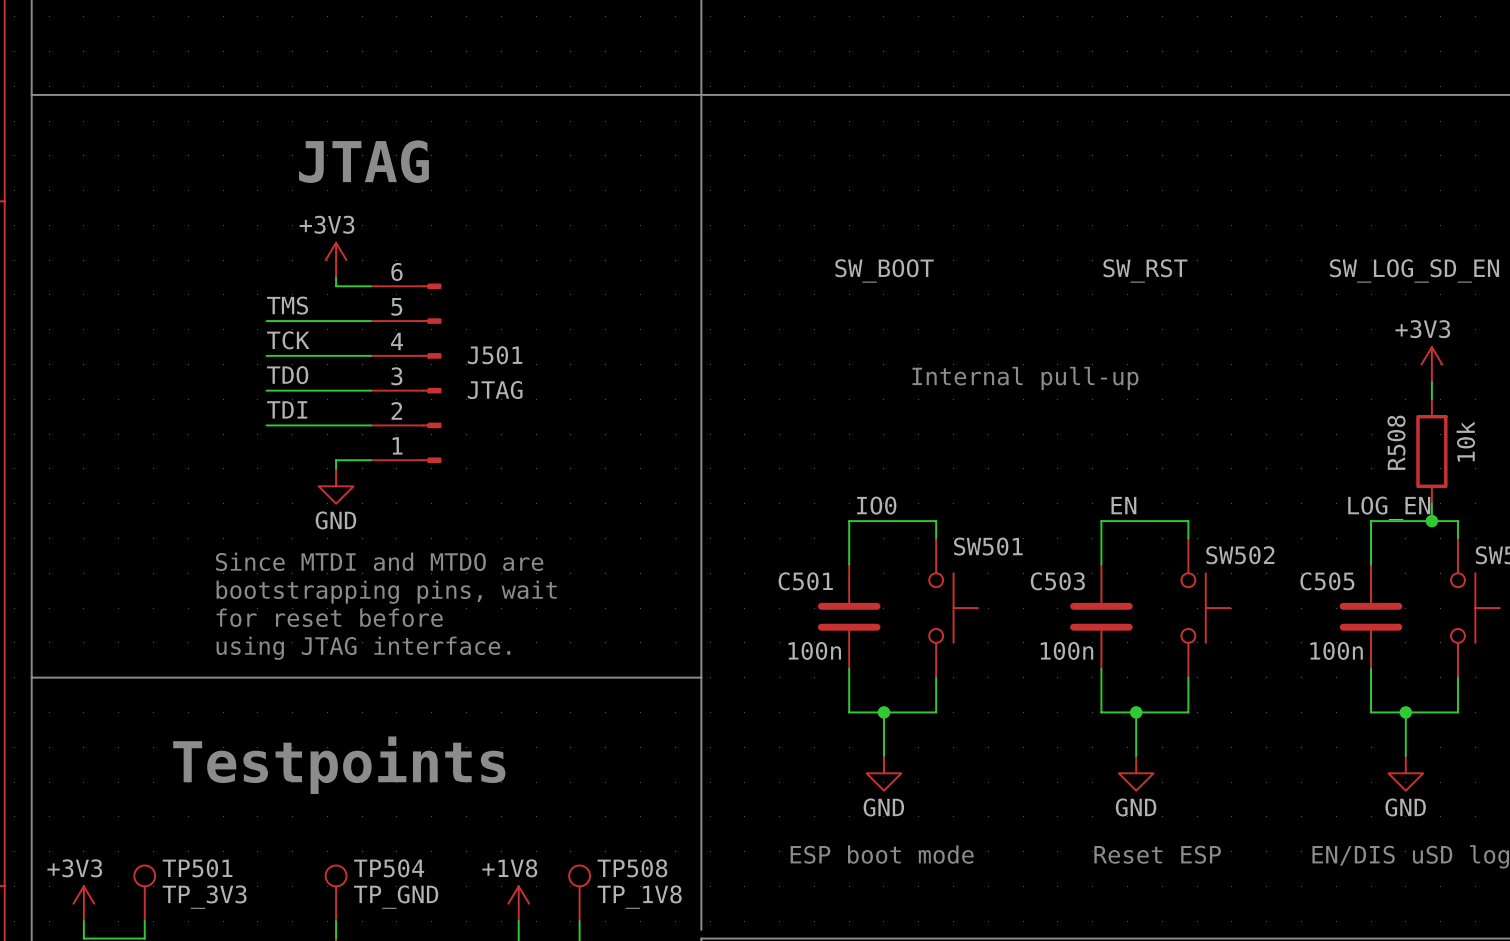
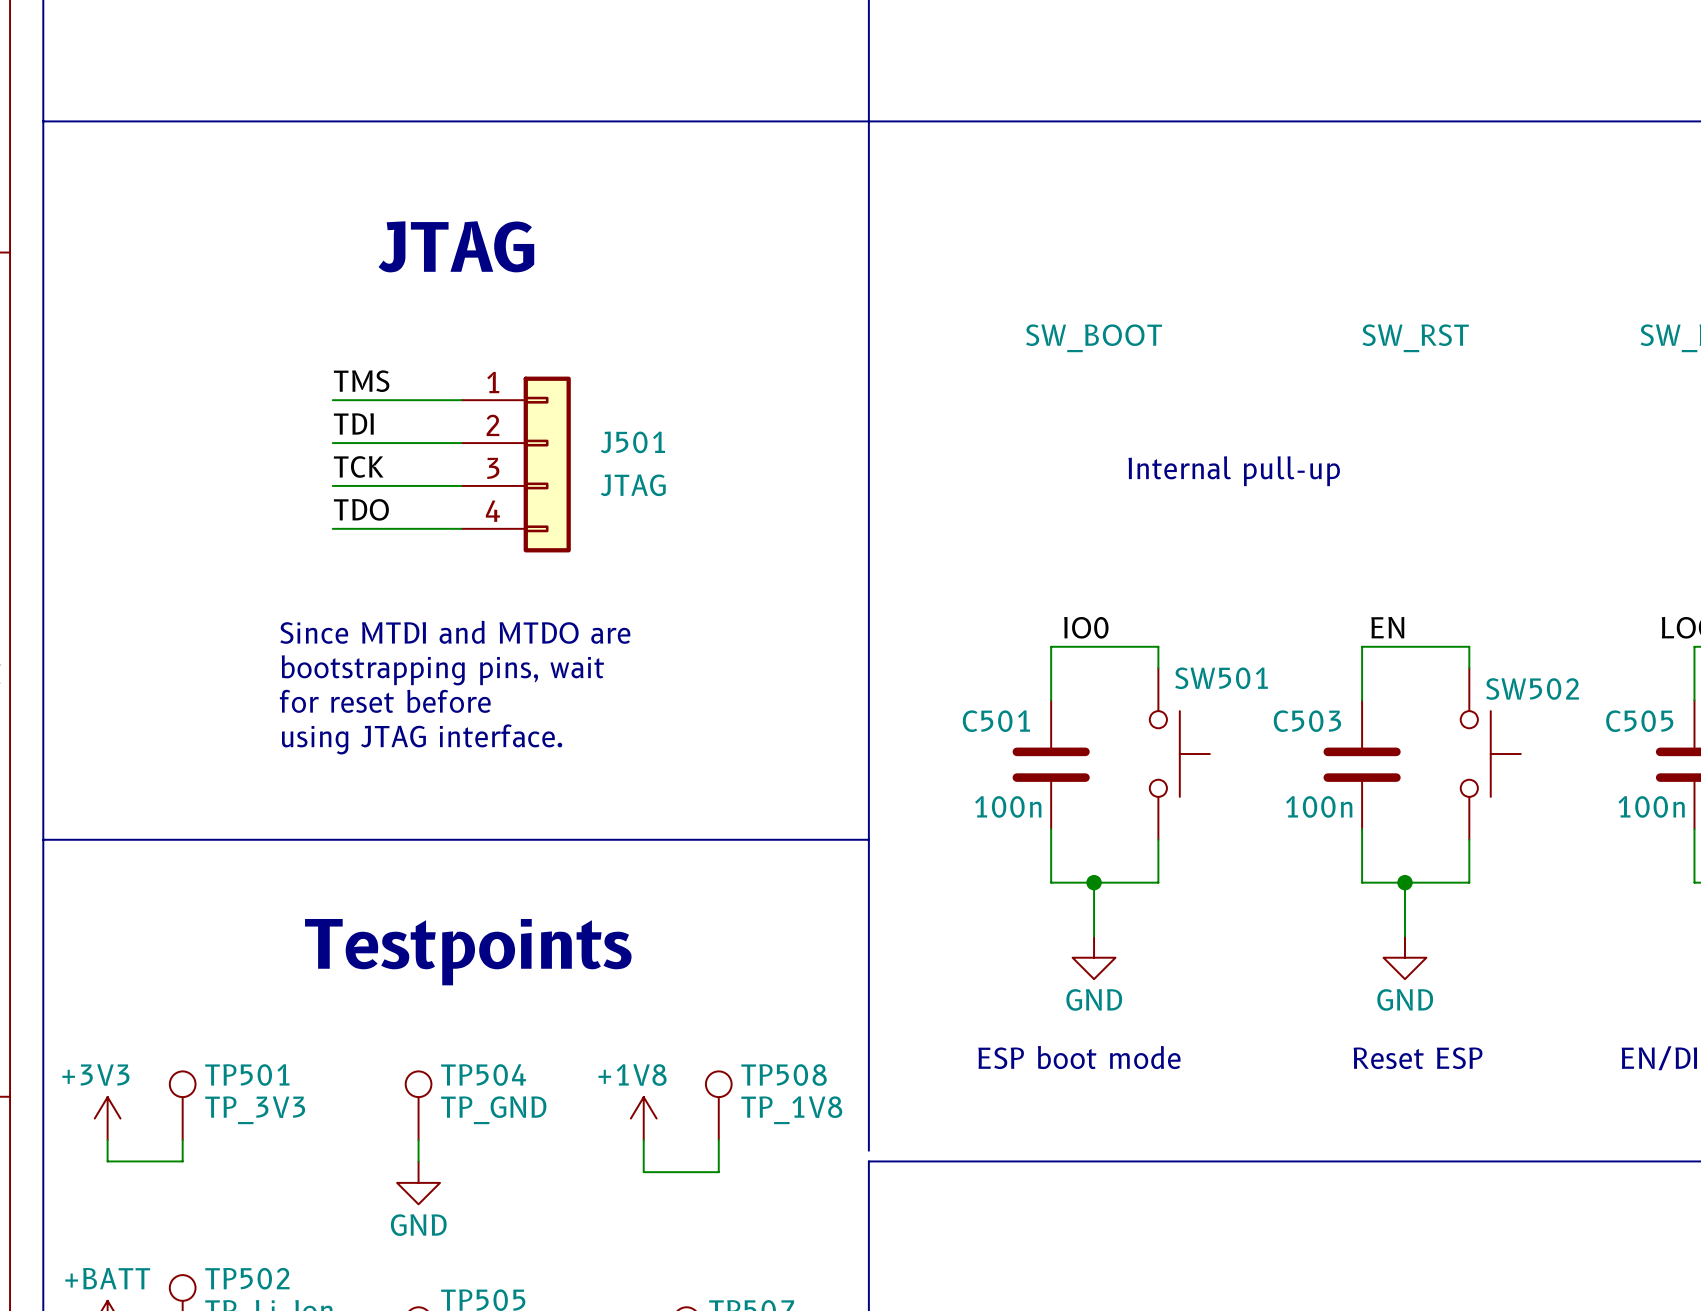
text position: JTAG (363, 161) -> JTAG (456, 246)
power symbol: +3V3 (336, 260) -> none
wire: (336, 277) (336, 286) (370, 286) -> none
J501 symbol: [370, 283, 442, 464] -> [461, 376, 571, 553]
label: TCK (288, 340) -> TDI (353, 423)
label: TDO (287, 375) -> TCK (358, 466)
label: TDI (287, 409) -> TDO (361, 509)
wire: (370, 460) (336, 460) (336, 468) -> none
power symbol: GND (336, 486) -> none
text position: Since MTDI and MTDO are (379, 561) -> Since MTDI and MTDO are (455, 632)
text position: bootstrapping pins, wait (386, 592) -> bootstrapping pins, wait (442, 670)
text position: for reset before (329, 617) -> for reset before (385, 701)
text position: using JTAG interface. (363, 648) -> using JTAG interface. (422, 739)

